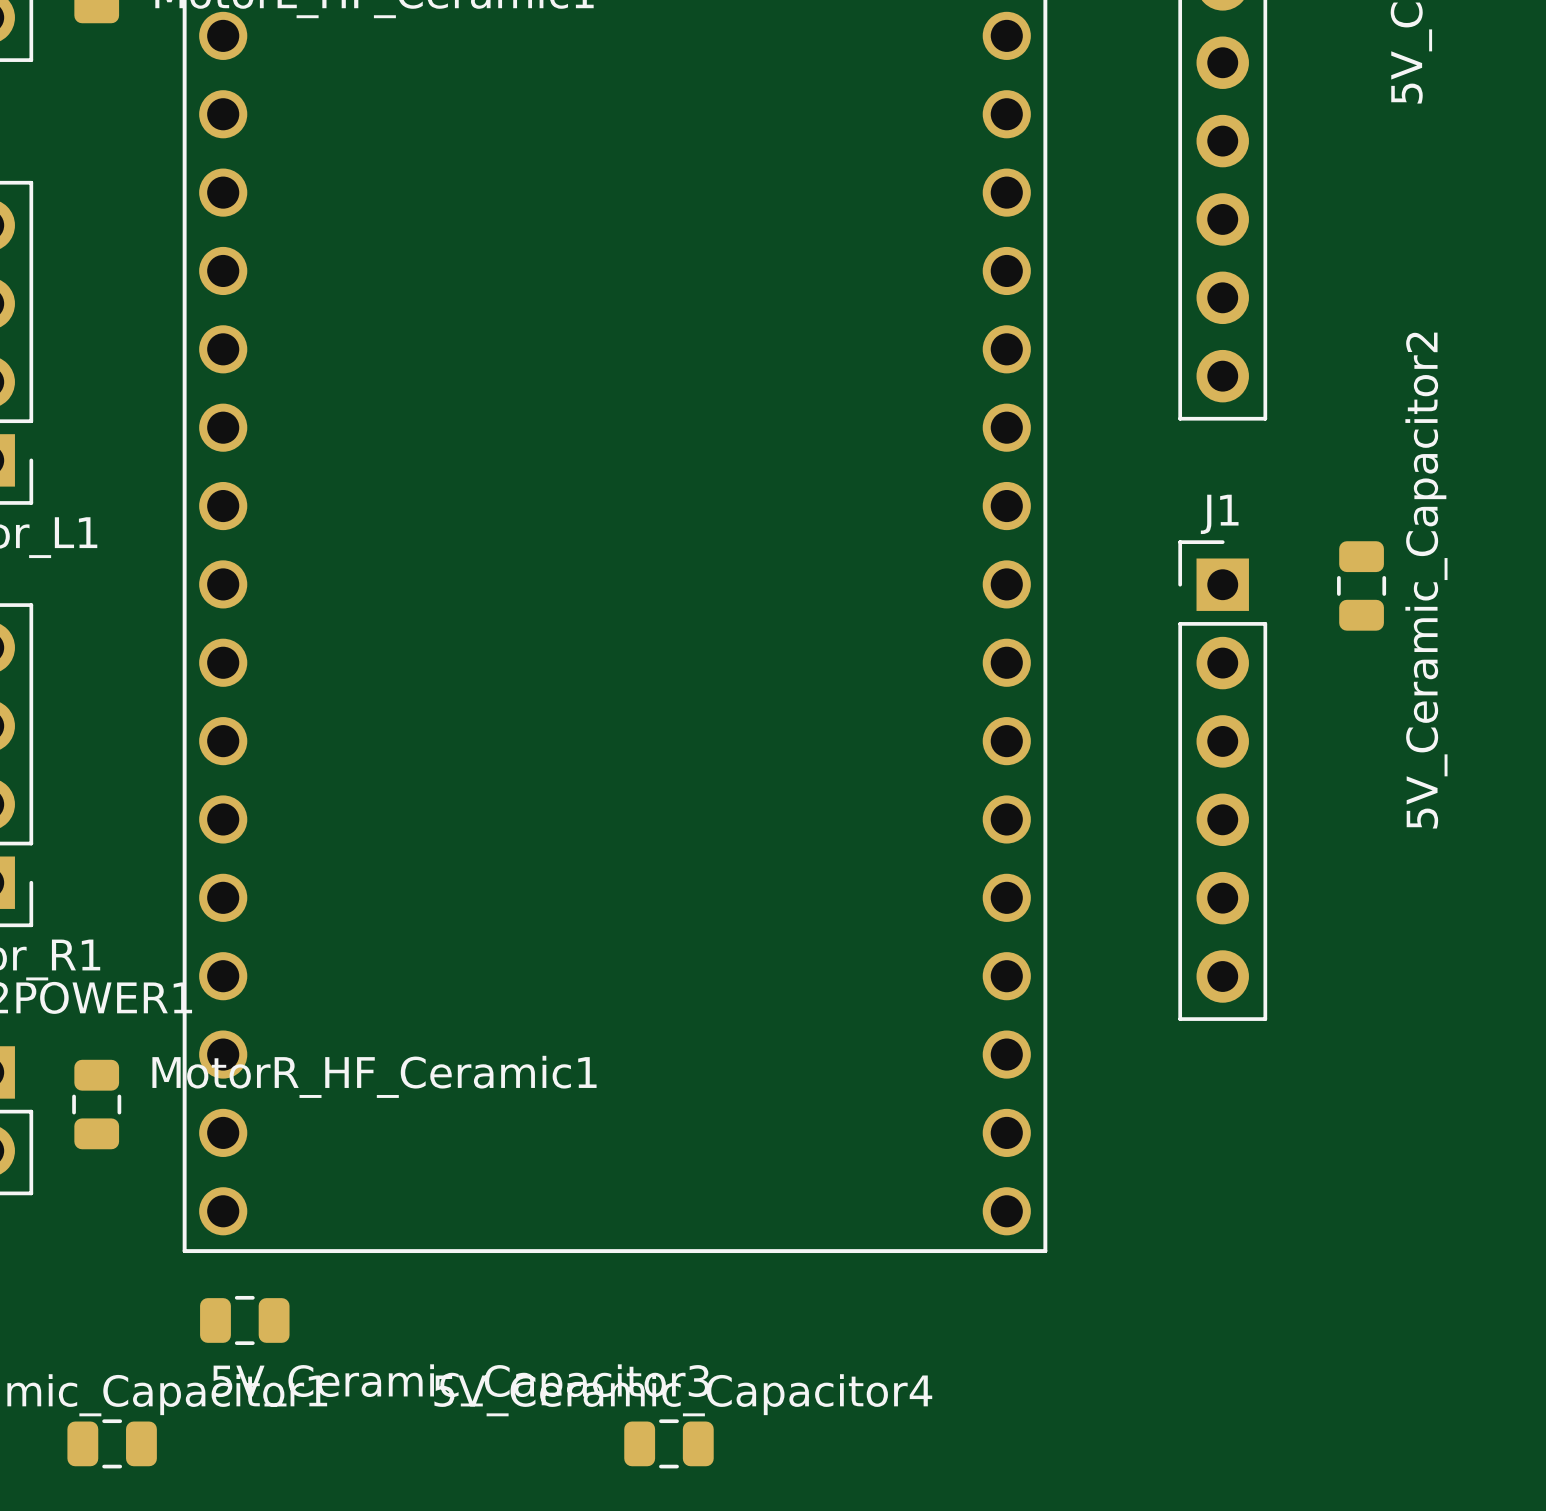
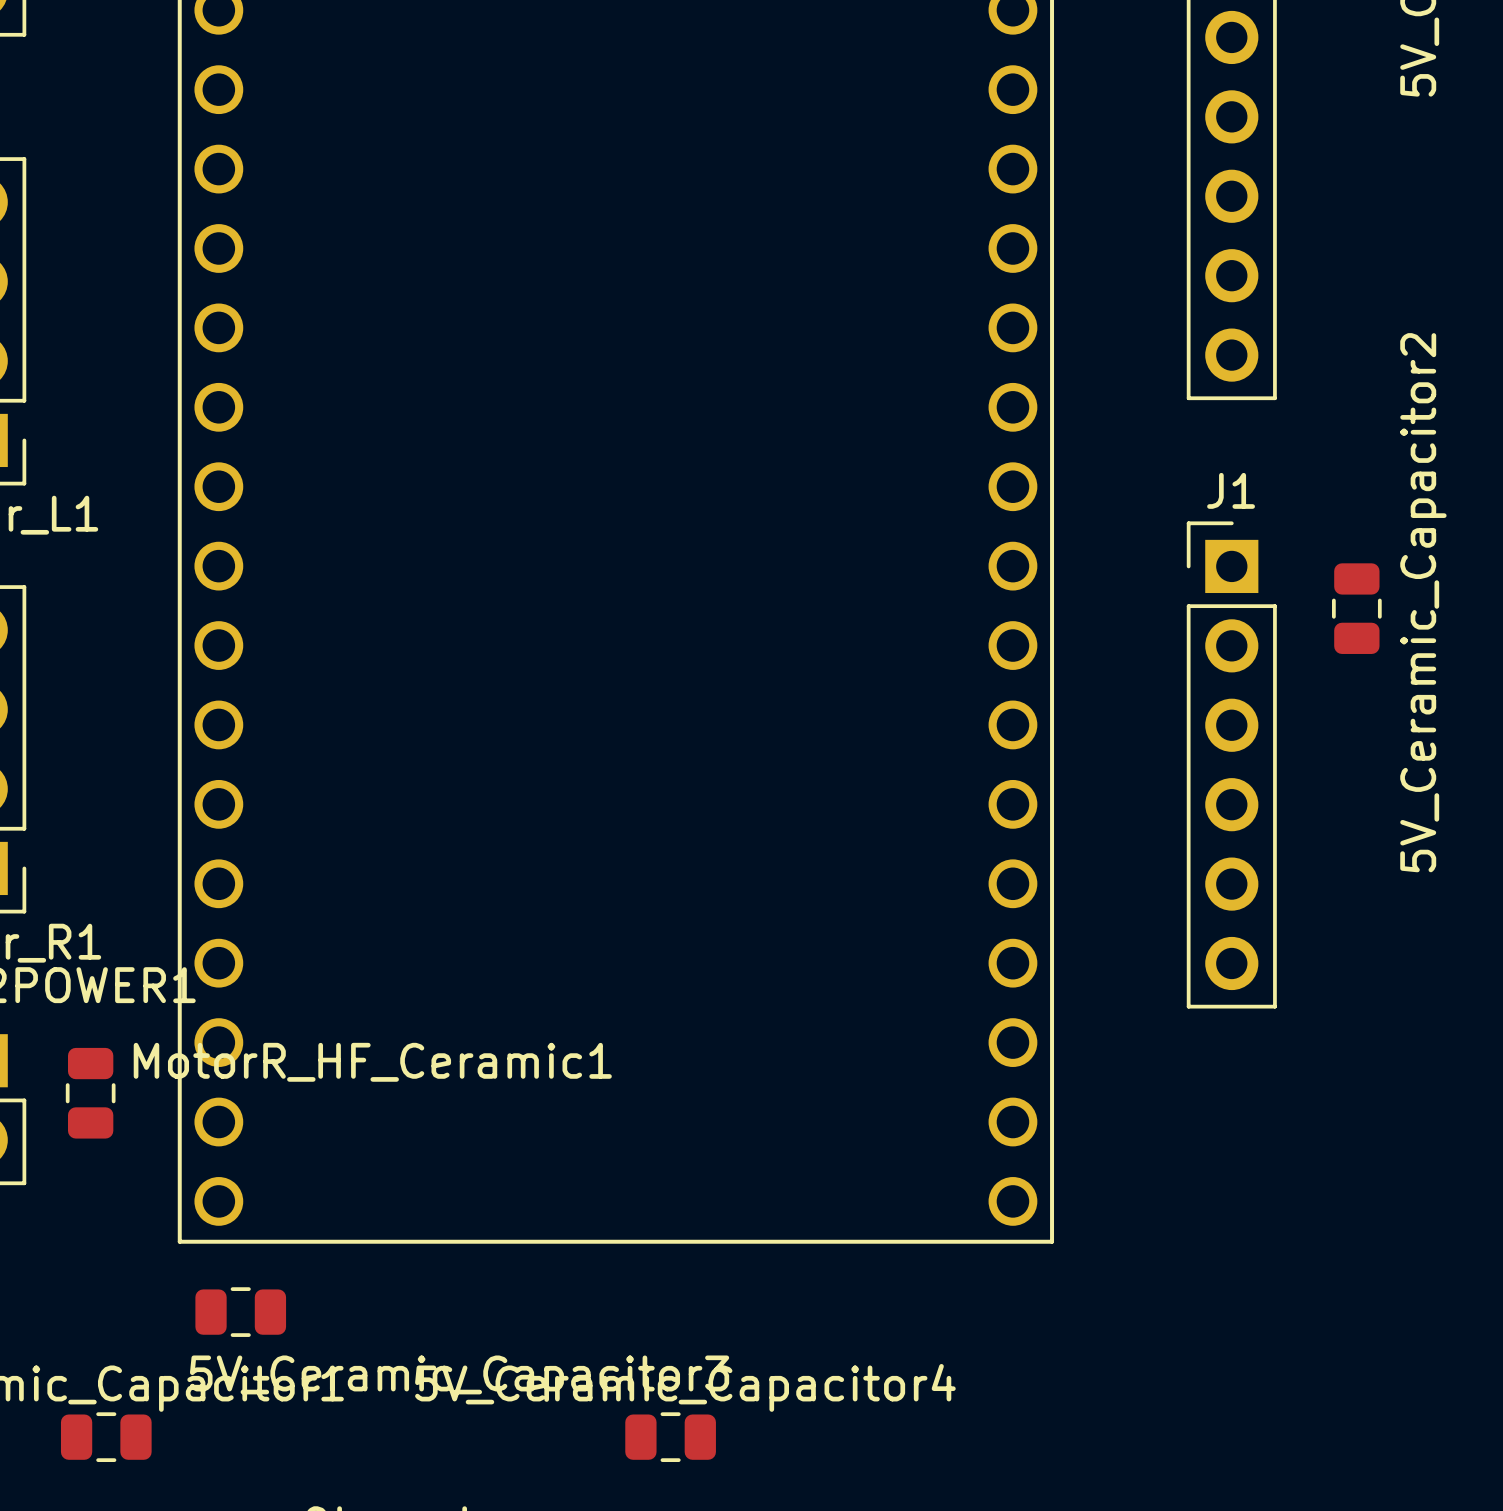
5V_Ceramic_Capacitor2 position: (1361, 585) -> (1356, 608)

